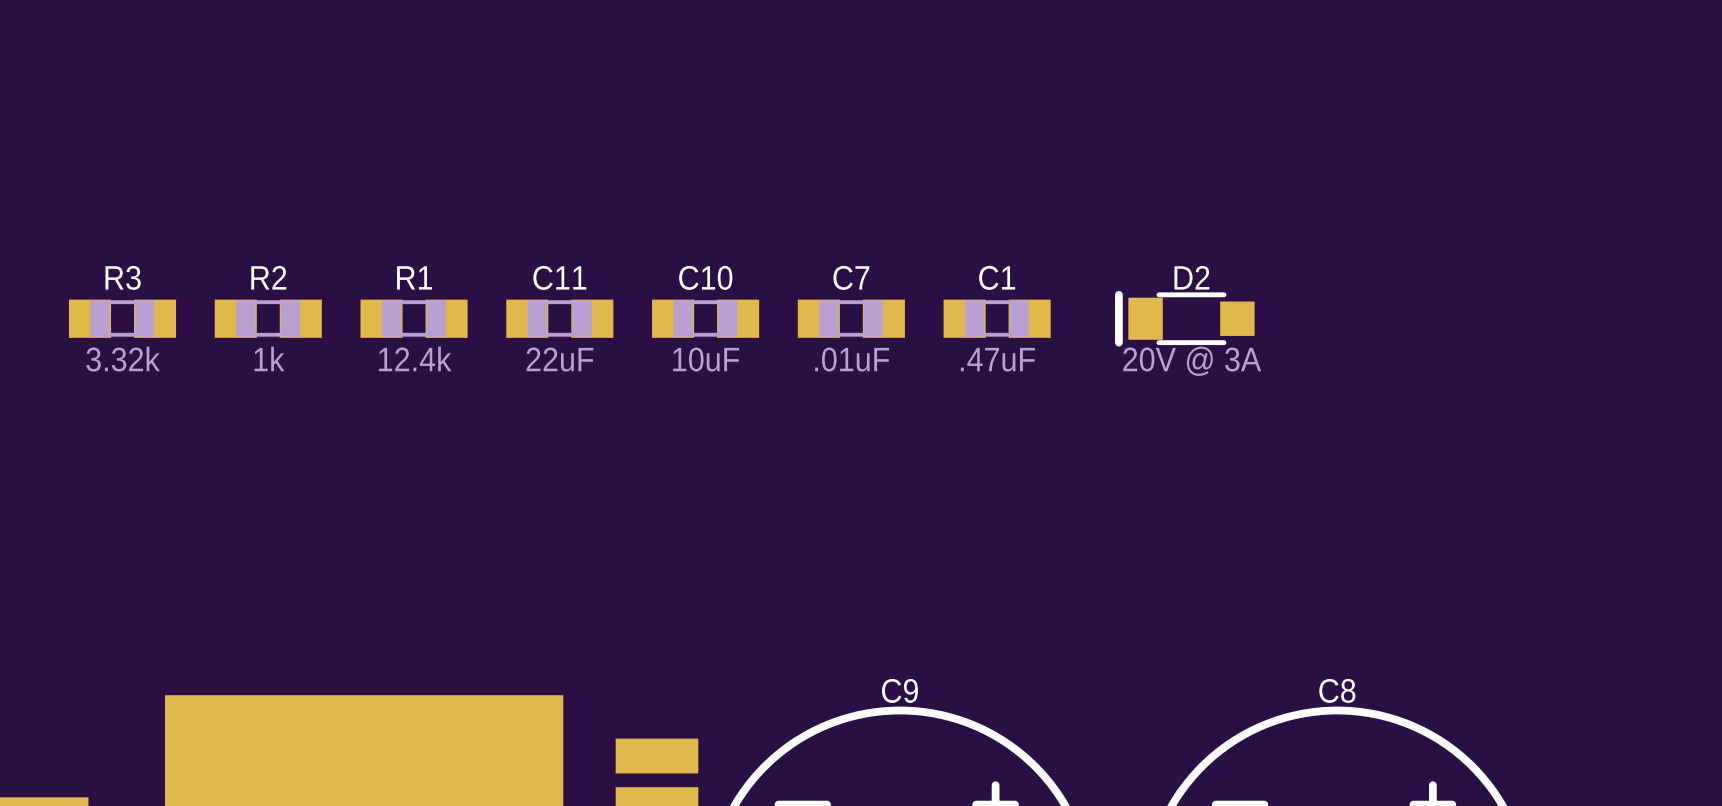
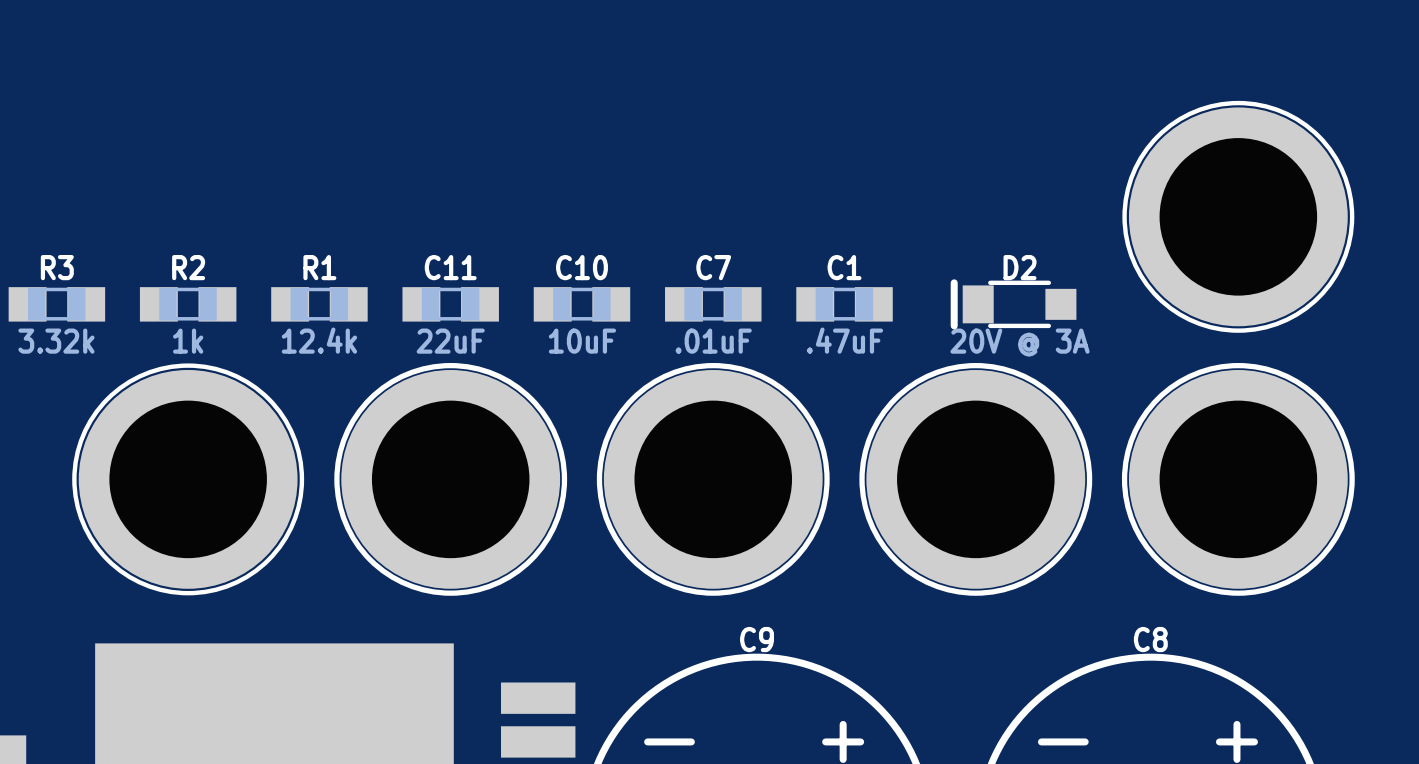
part: none -> (1238, 216)
part: none -> (188, 479)
part: none -> (450, 479)
part: none -> (713, 479)
part: none -> (975, 479)
part: none -> (1238, 479)

